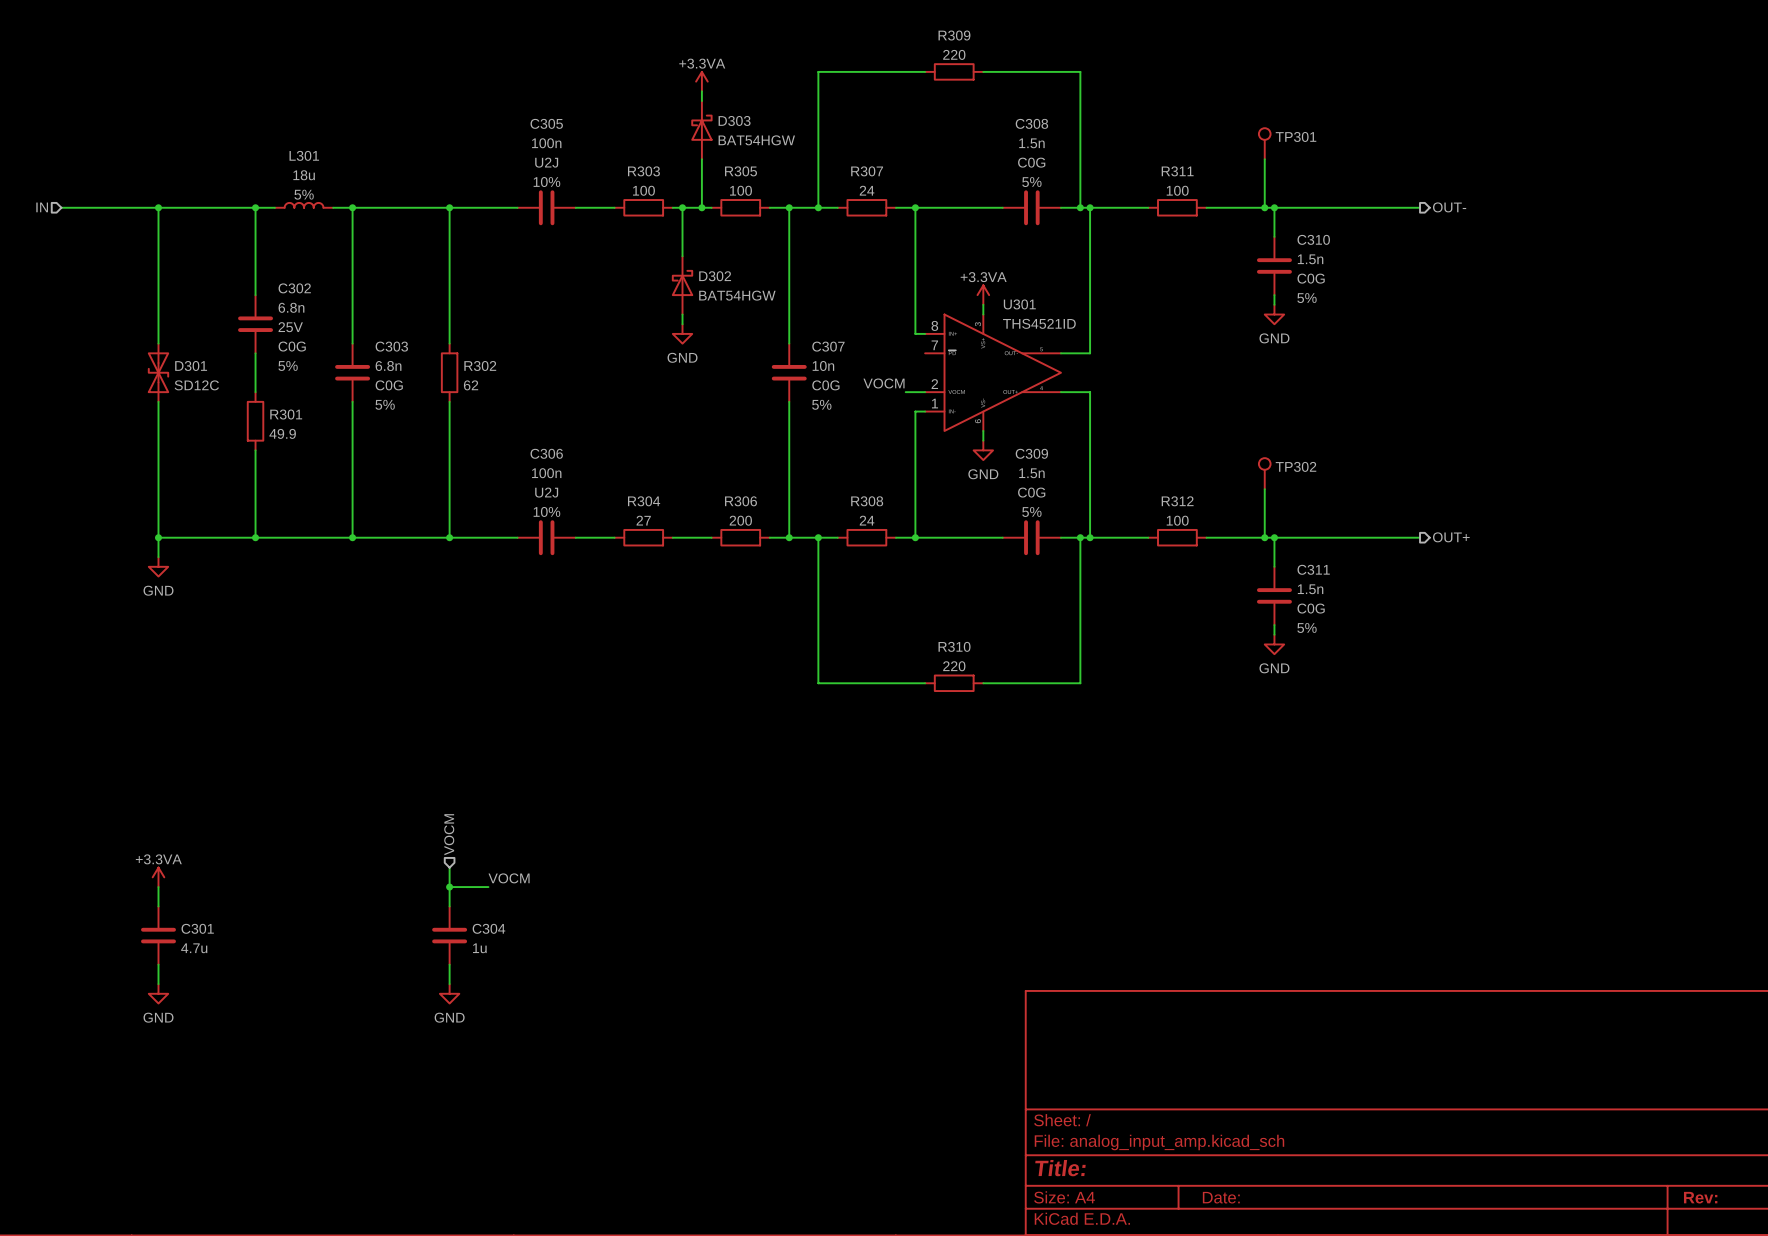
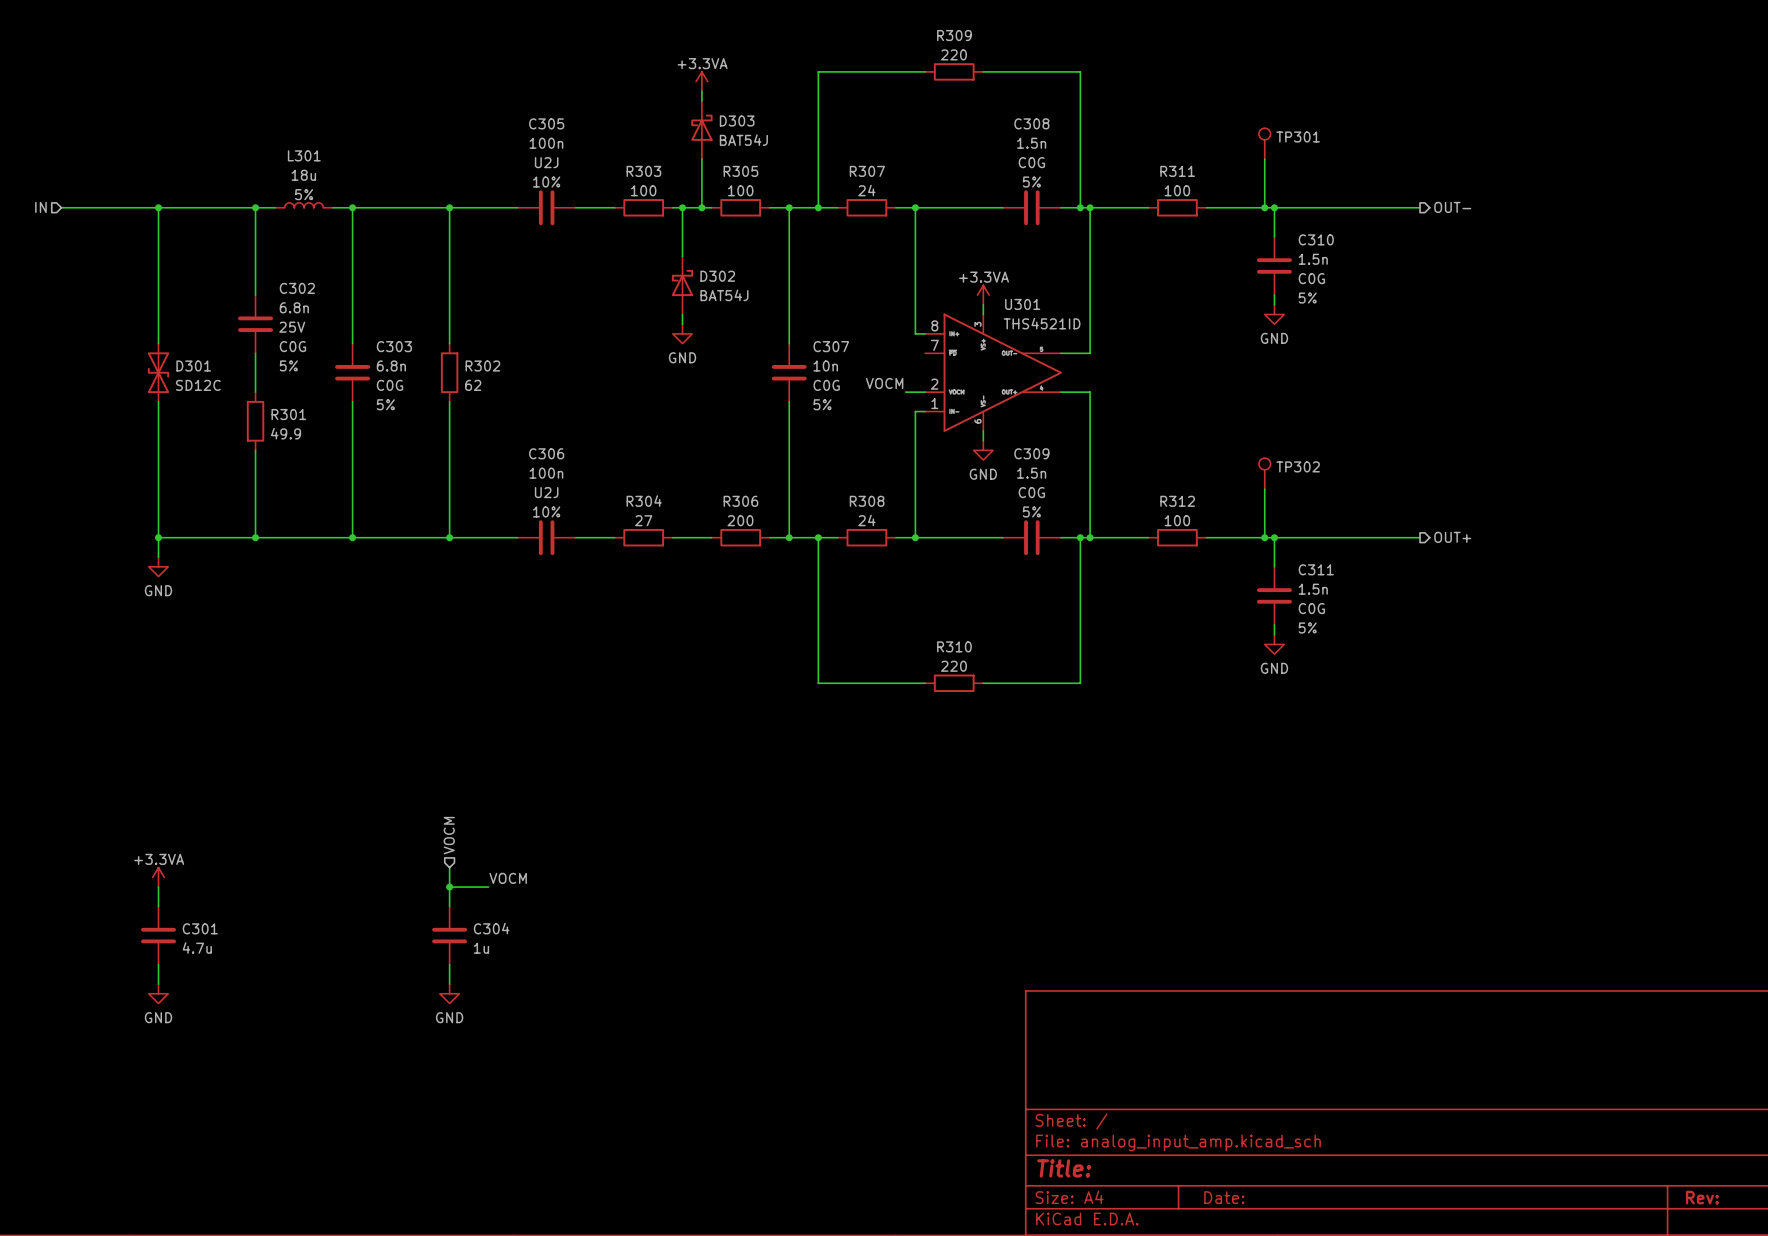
D303 value: BAT54HGW (756, 140) -> BAT54J (743, 140)
D302 value: BAT54HGW (737, 295) -> BAT54J (724, 295)

